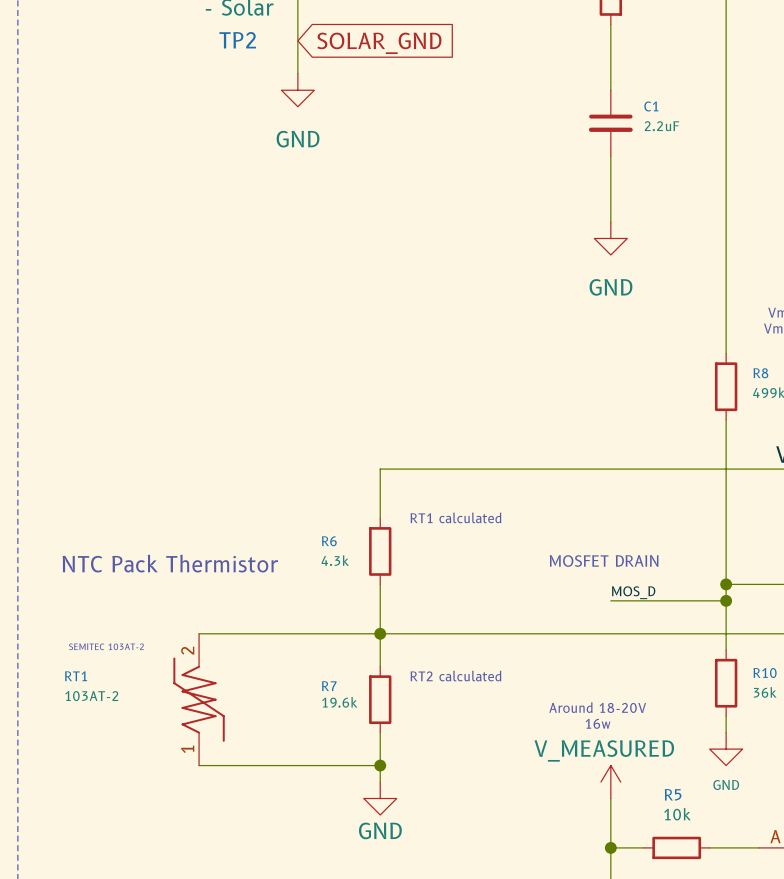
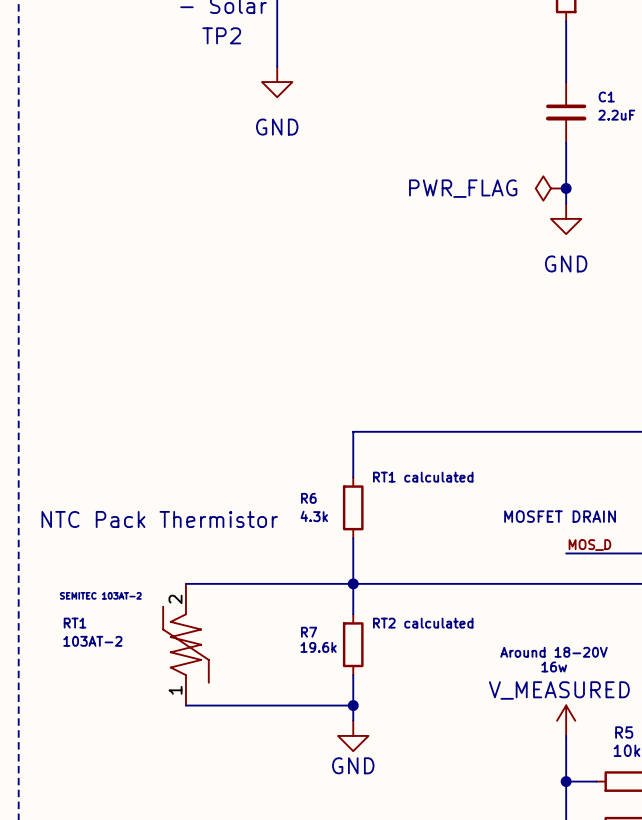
global label: SOLAR_GND (379, 43) -> none
power symbol: none -> PWR_FLAG (550, 188)
junction: none -> (566, 188)

